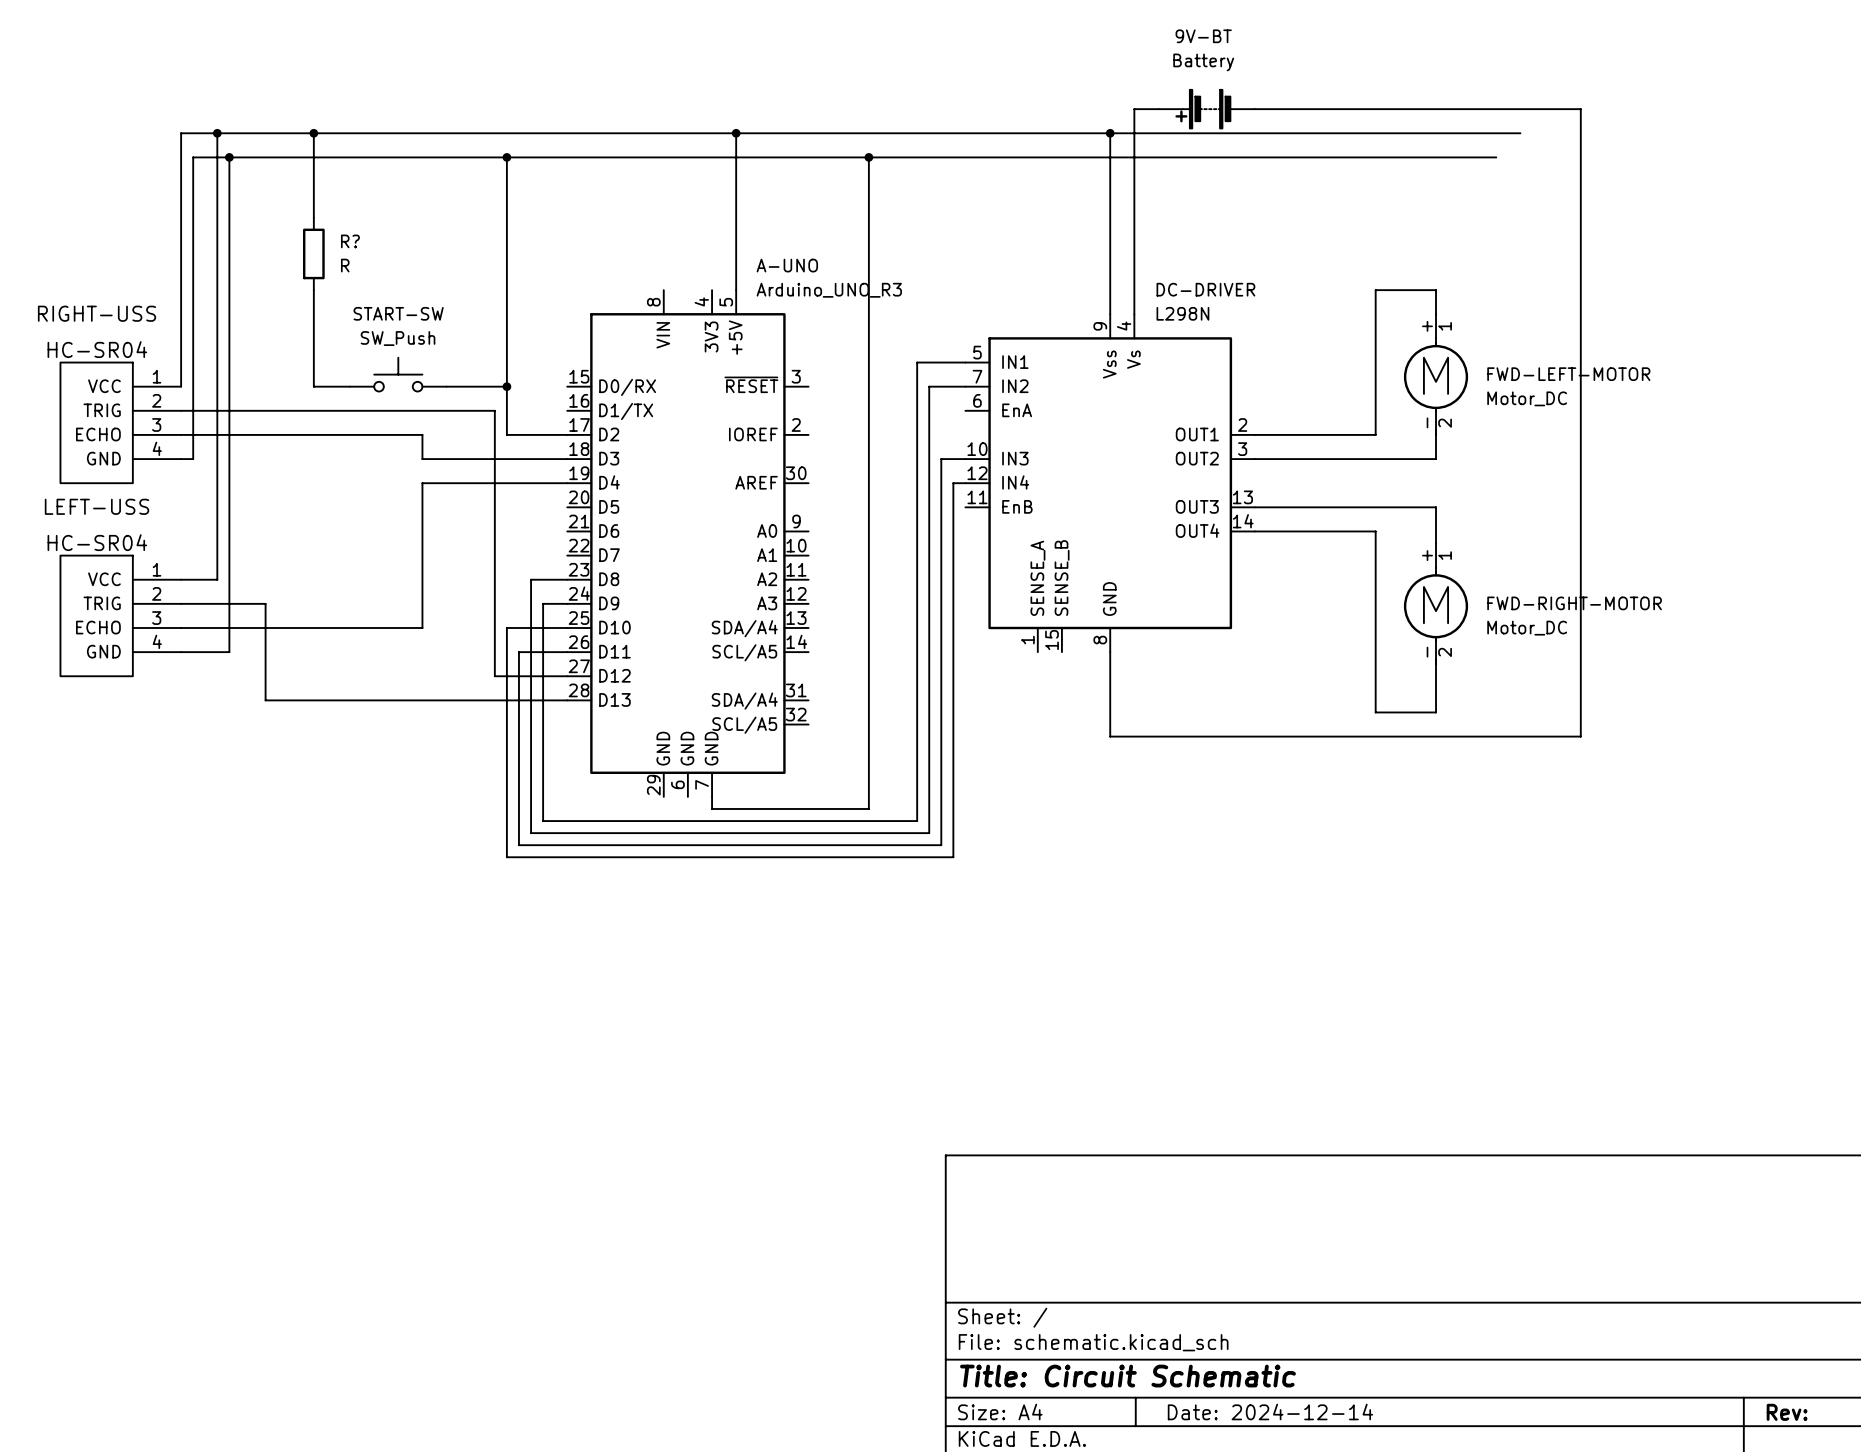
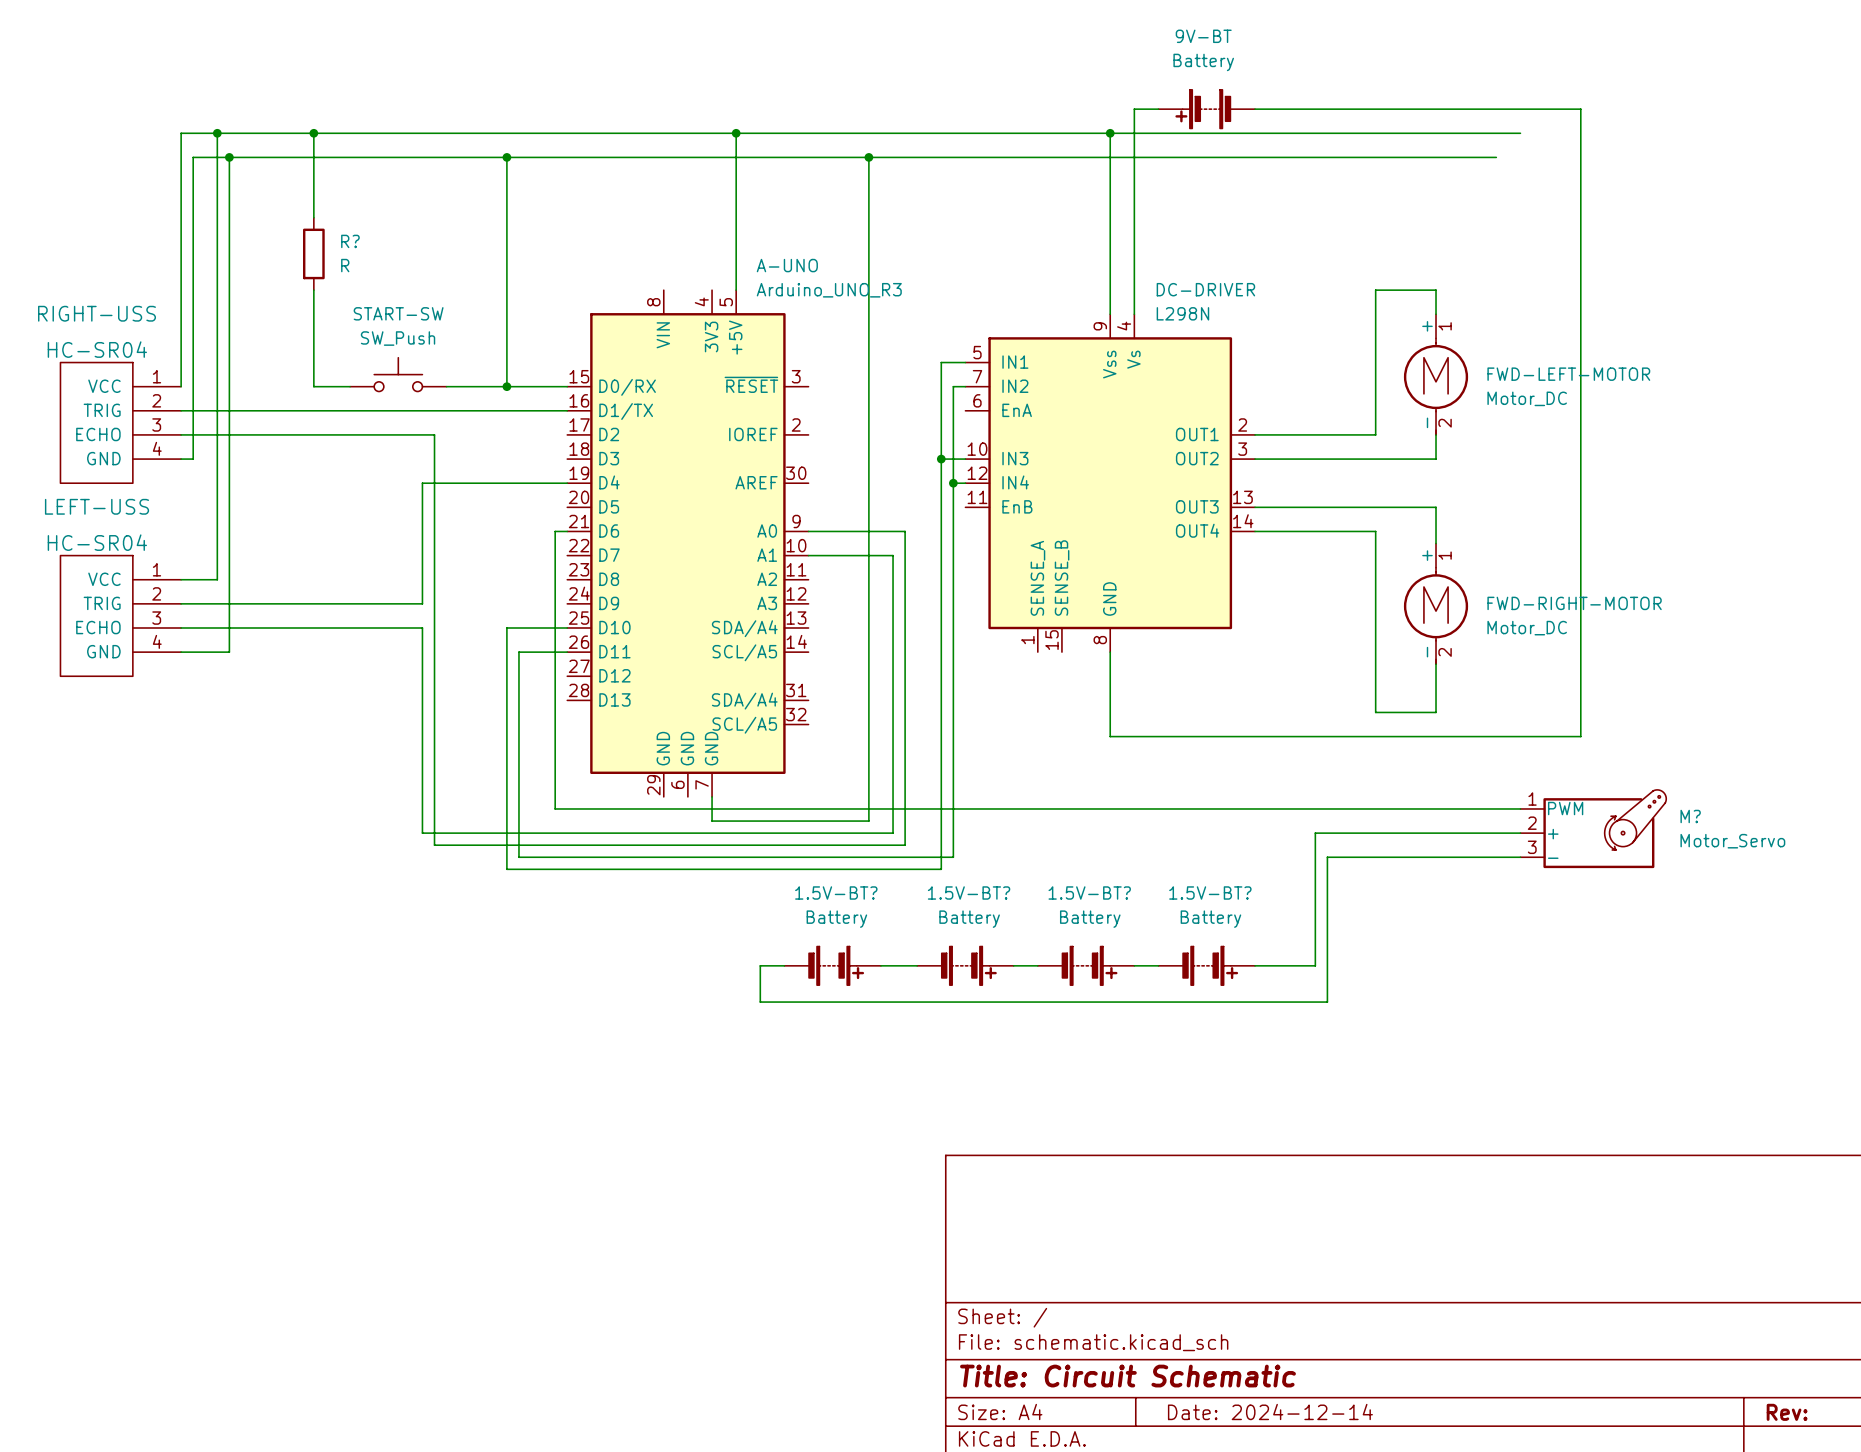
wire: (941, 362) (917, 362) (917, 821) (868, 821) -> (941, 362) (941, 459)
wire: (506, 386) (506, 434) (567, 434) -> (506, 386) (567, 386)
wire: (953, 386) (929, 386) (929, 833) (893, 833) -> (808, 555) (893, 555) (893, 833)
wire: none -> (953, 386) (953, 483)
wire: (494, 410) (494, 676) (567, 676) -> (494, 410) (567, 410)
wire: (422, 434) (422, 459) (567, 459) -> (422, 434) (434, 434) (434, 845) (518, 845) (518, 857)
junction: none -> (941, 459)
junction: none -> (953, 483)
wire: (567, 579) (531, 579) (531, 833) -> (422, 627) (422, 833) (531, 833)
wire: (265, 603) (265, 700) (567, 700) -> none
wire: (422, 603) (422, 627) -> (422, 603) (265, 603)
wire: (567, 603) (543, 603) (543, 821) (712, 821) -> (567, 531) (555, 531) (555, 808) (712, 808) (712, 821)
wire: none -> (1520, 808) (868, 808) (868, 821)
M?: none -> Motor_Servo (1593, 829)
wire: none -> (1520, 833) (1315, 833) (1315, 965) (1255, 965)
wire: (905, 845) (941, 845) -> (905, 845) (905, 531) (808, 531)
wire: (506, 857) (518, 857) -> (506, 857) (506, 869) (941, 869) (941, 845)
wire: none -> (1520, 857) (1327, 857) (1327, 1002) (760, 1002) (760, 965) (784, 965)
1.5V-BT?: none -> Battery (832, 965)
wire: none -> (880, 965) (917, 965)
1.5V-BT?: none -> Battery (965, 965)
wire: none -> (1013, 965) (1037, 965)
1.5V-BT?: none -> Battery (1086, 965)
wire: none -> (1134, 965) (1158, 965)
1.5V-BT?: none -> Battery (1206, 965)

